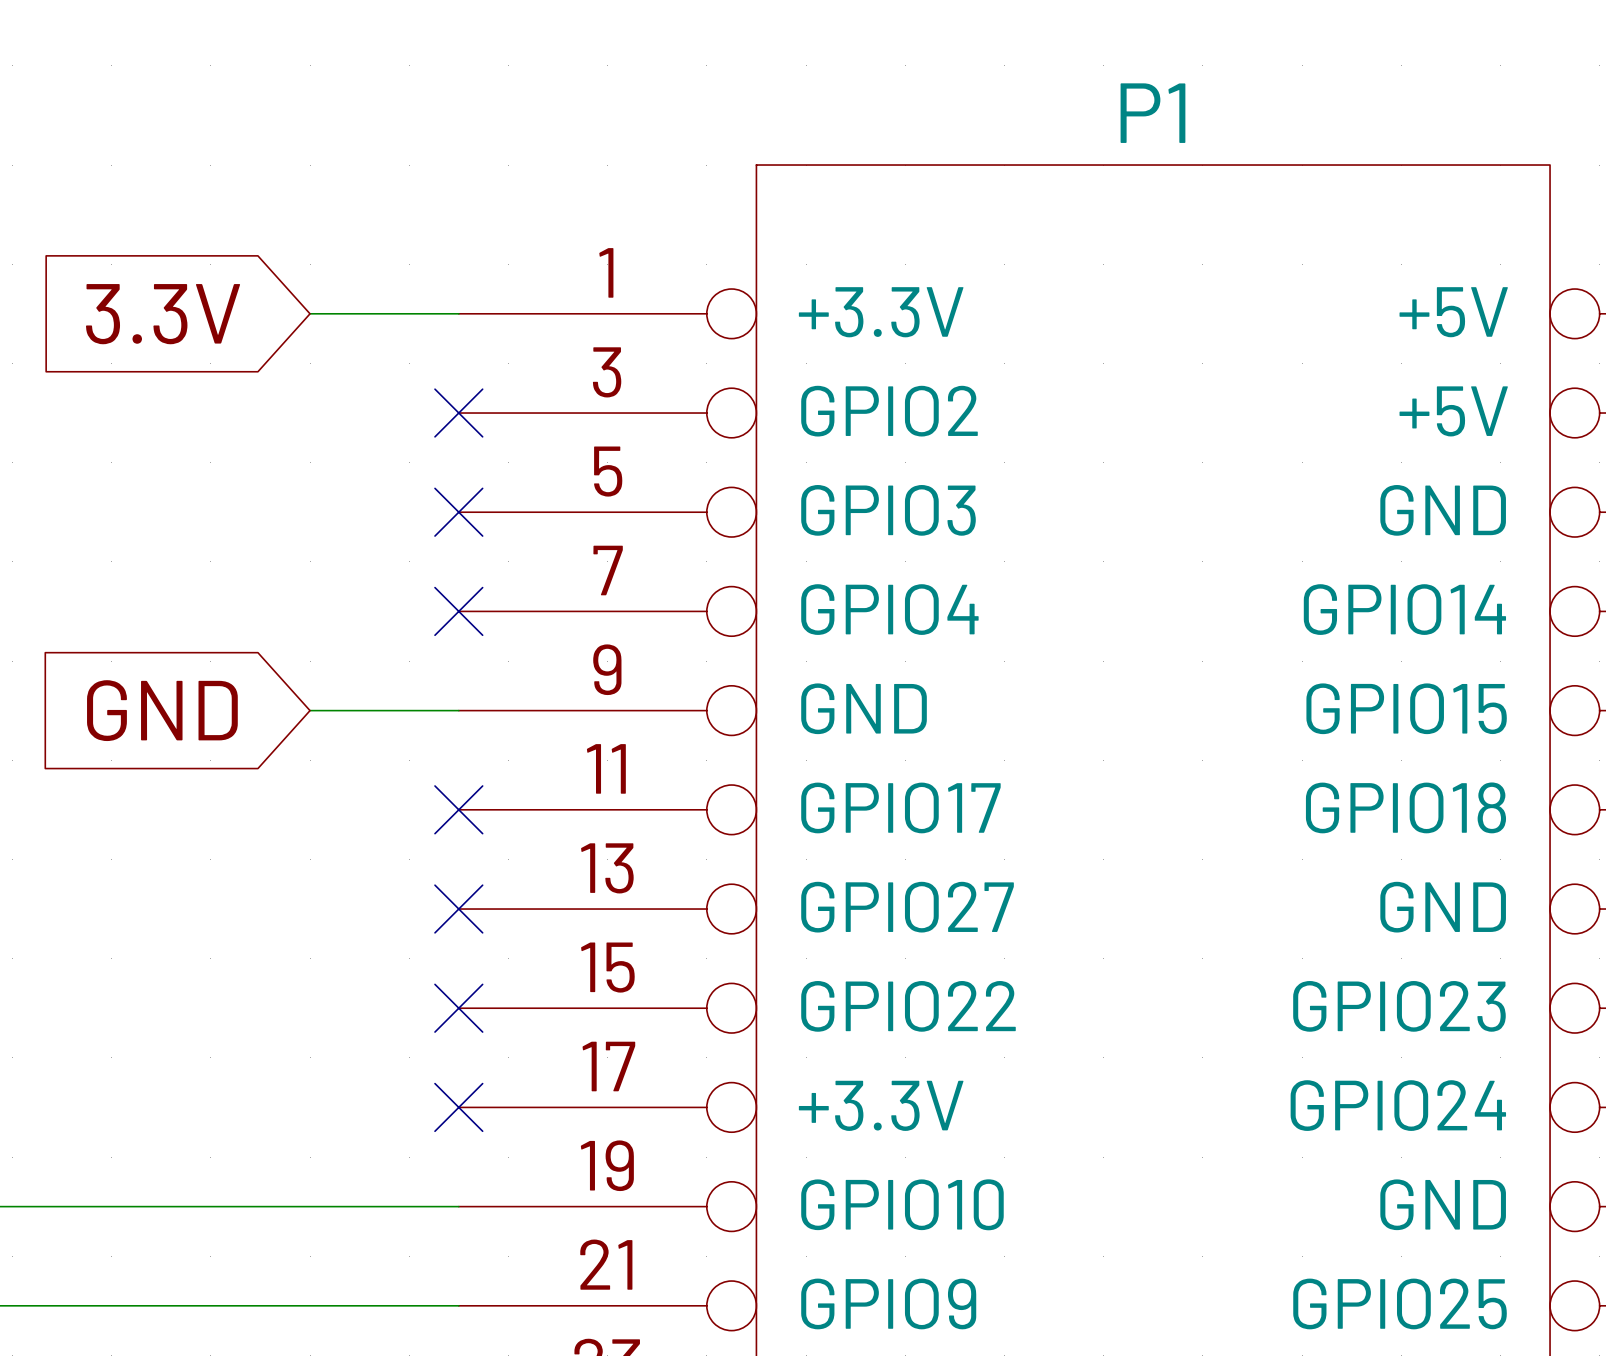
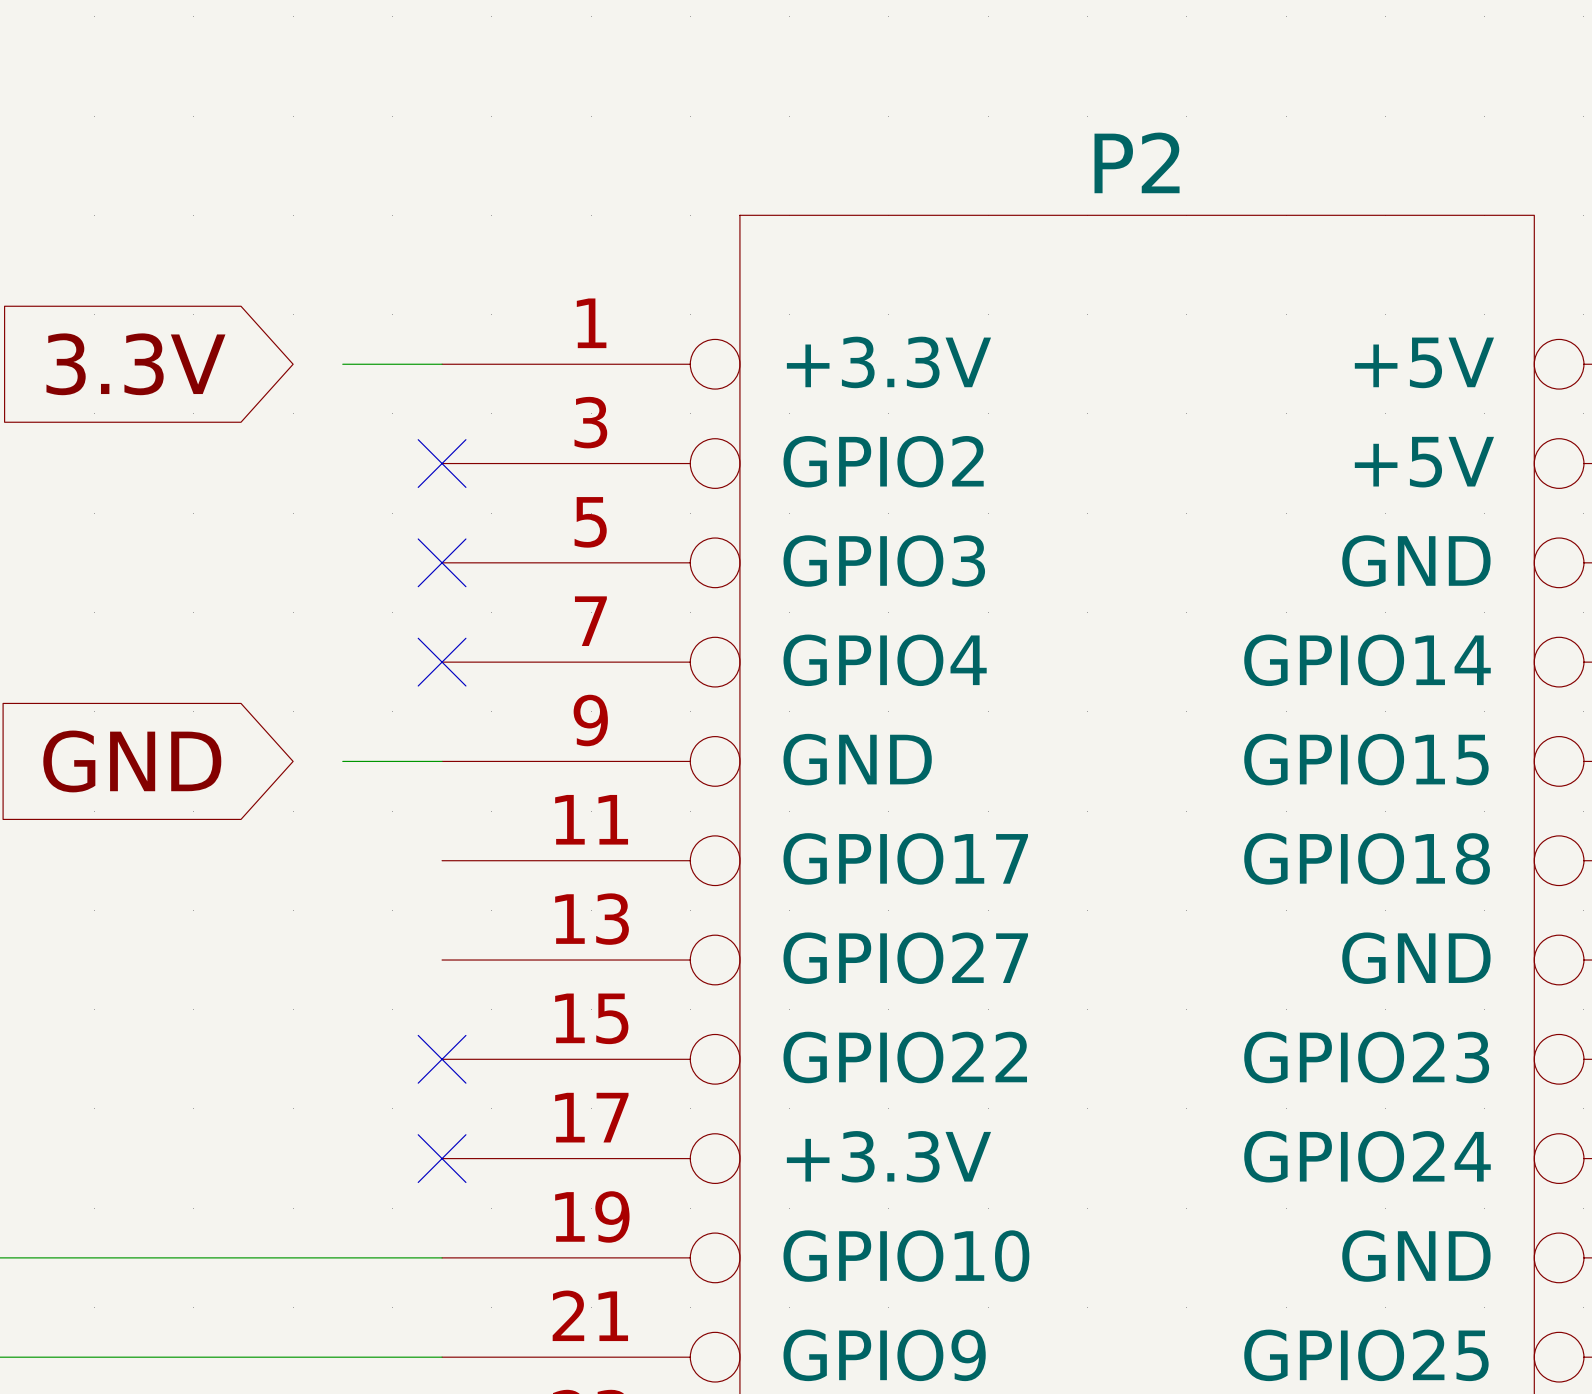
P1 name: P1 (1152, 113) -> P2 (1137, 162)
wire: (310, 313) (359, 313) -> none
wire: (310, 710) (359, 710) -> none
no-connect mark: (458, 809) -> none
no-connect mark: (458, 909) -> none

